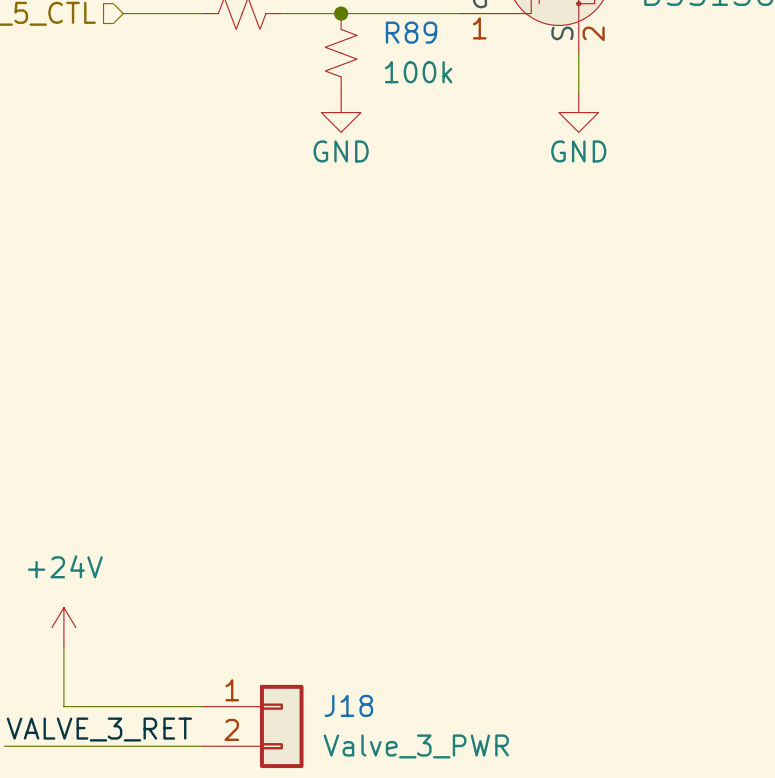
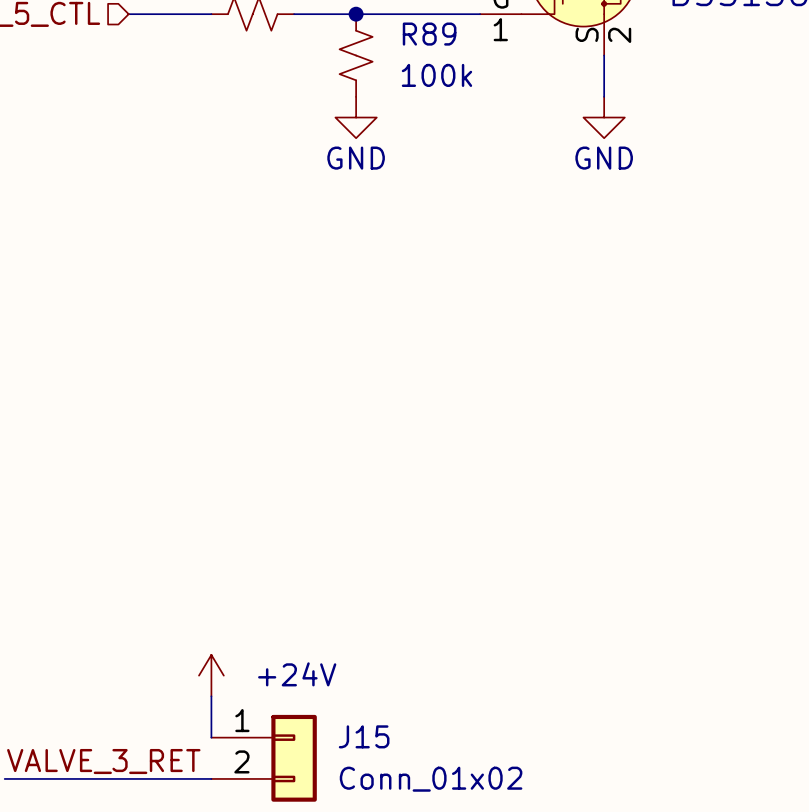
power symbol text position: +24V (65, 566) -> +24V (297, 674)
power symbol position: +24V (63, 627) -> +24V (211, 675)
wire: (63, 647) (63, 706) (202, 706) -> (211, 696) (211, 737)
J18 name: J18 (348, 705) -> J15 (364, 736)
J18 value: Valve_3_PWR (416, 746) -> Conn_01x02 (431, 779)

